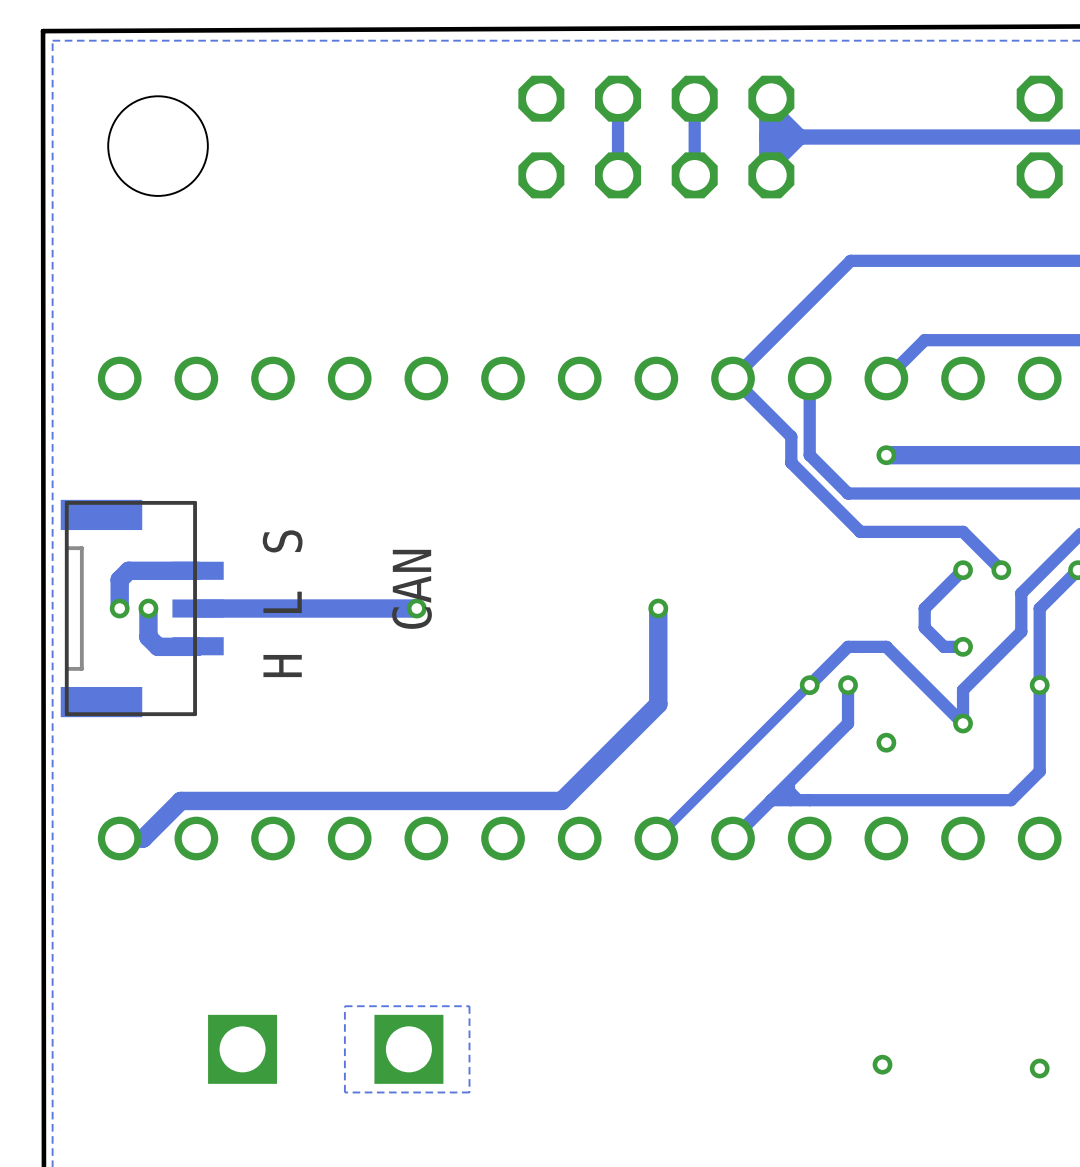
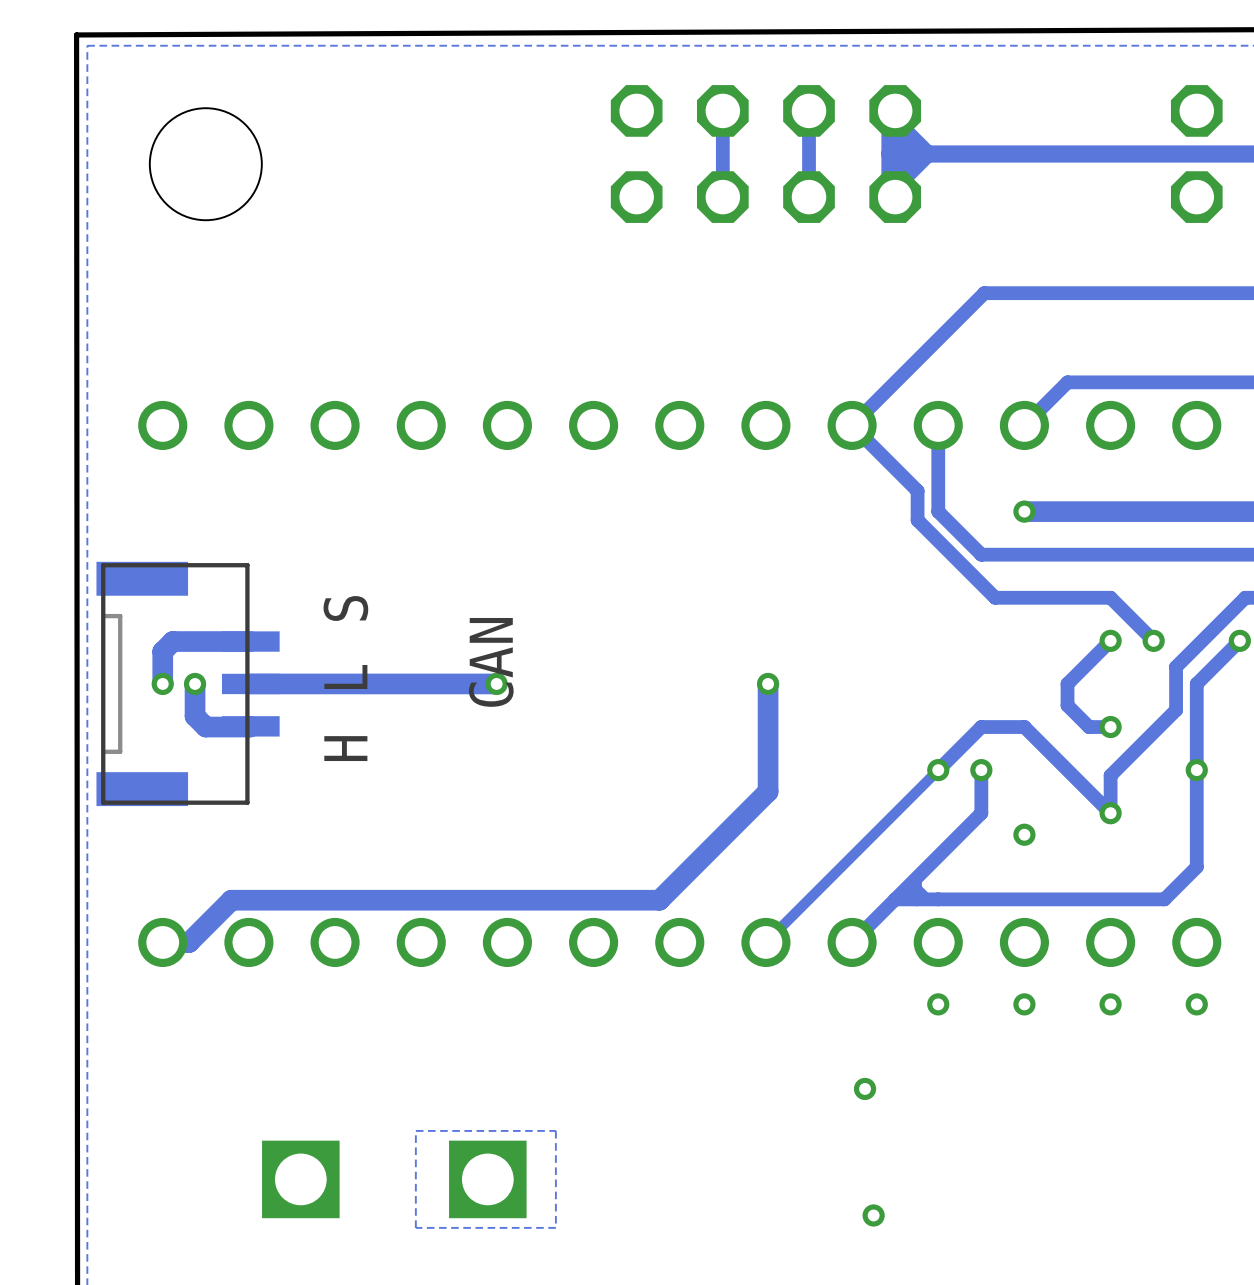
via: none -> (938, 1004)
via: none -> (1024, 1004)
via: none -> (1110, 1004)
via: none -> (1196, 1004)
via: none -> (865, 1088)
via: (882, 1064) -> none
via: (1039, 1068) -> none
via: none -> (873, 1215)

